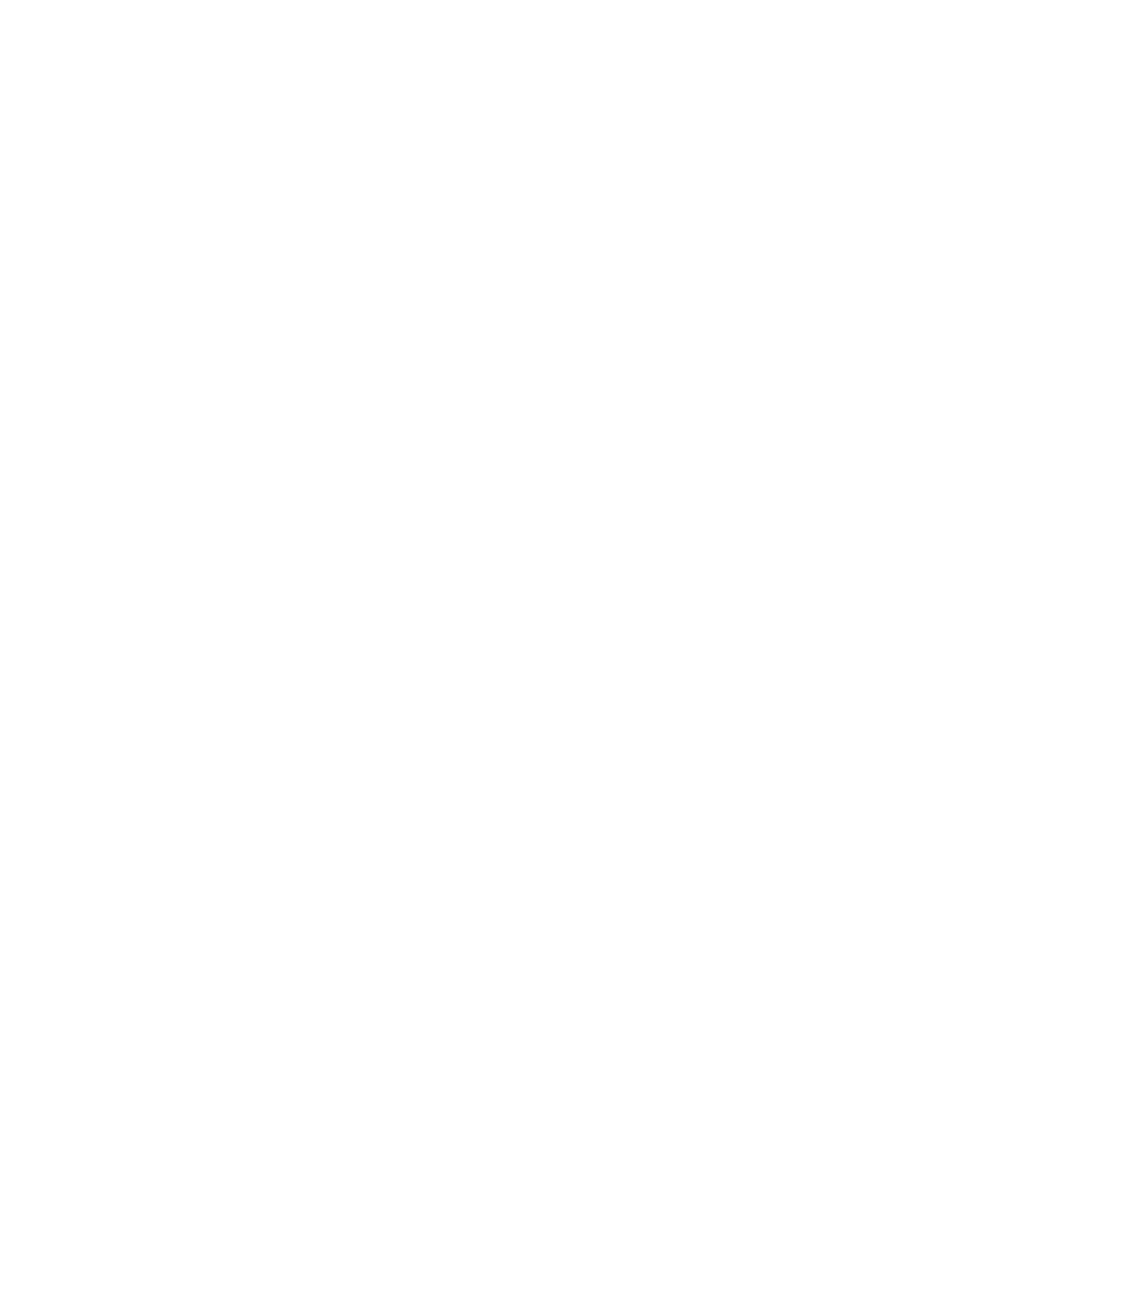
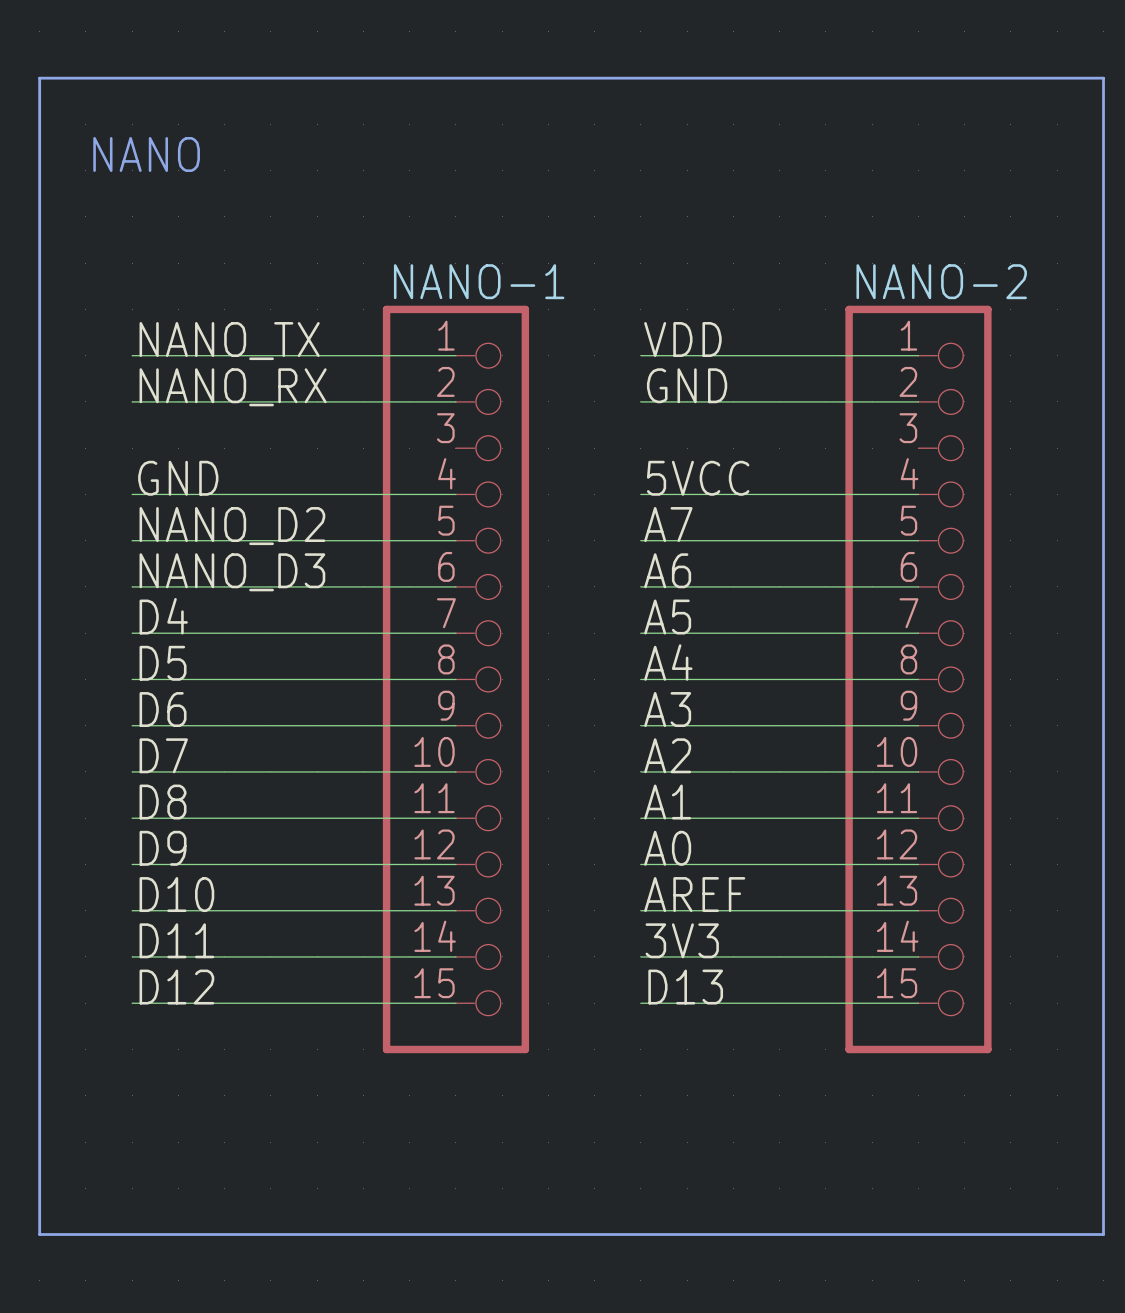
line: none -> (39, 78) (1103, 78) (1103, 1234) (39, 1234) (39, 78)
text: none -> NANO (146, 154)
label: none -> VDD (682, 339)
label: none -> NANO_TX (229, 341)
wire: none -> (132, 355) (455, 355)
wire: none -> (640, 355) (918, 355)
label: none -> GND (687, 385)
label: none -> NANO_RX (233, 387)
wire: none -> (132, 401) (455, 401)
wire: none -> (640, 401) (918, 401)
label: none -> GND (178, 478)
label: none -> 5VCC (698, 478)
wire: none -> (132, 494) (455, 494)
wire: none -> (640, 494) (918, 494)
label: none -> A7 (668, 524)
label: none -> NANO_D2 (232, 526)
wire: none -> (132, 540) (455, 540)
wire: none -> (640, 540) (918, 540)
label: none -> A6 (667, 570)
label: none -> NANO_D3 (232, 572)
wire: none -> (132, 586) (455, 586)
wire: none -> (640, 586) (918, 586)
label: none -> D4 (163, 616)
label: none -> A5 (667, 617)
wire: none -> (132, 633) (455, 633)
wire: none -> (640, 633) (918, 633)
label: none -> A4 (668, 662)
label: none -> D5 (163, 663)
wire: none -> (132, 679) (455, 679)
NANO-1: none -> (455, 679)
wire: none -> (640, 679) (918, 679)
NANO-2: none -> (918, 679)
label: none -> D6 (163, 709)
label: none -> A3 (667, 709)
wire: none -> (132, 725) (455, 725)
wire: none -> (640, 725) (918, 725)
label: none -> D7 (163, 755)
label: none -> A2 (667, 755)
wire: none -> (132, 771) (455, 771)
wire: none -> (640, 771) (918, 771)
label: none -> D8 (163, 802)
label: none -> A1 (667, 802)
wire: none -> (132, 818) (455, 818)
wire: none -> (640, 818) (918, 818)
label: none -> D9 (163, 848)
label: none -> A0 (667, 848)
wire: none -> (132, 864) (455, 864)
wire: none -> (640, 864) (918, 864)
label: none -> D10 (176, 894)
label: none -> AREF (694, 894)
wire: none -> (132, 910) (455, 910)
wire: none -> (640, 910) (918, 910)
label: none -> D11 (176, 940)
label: none -> 3V3 (682, 940)
wire: none -> (132, 956) (455, 956)
wire: none -> (640, 956) (918, 956)
label: none -> D12 (176, 987)
label: none -> D13 (685, 987)
wire: none -> (132, 1003) (455, 1003)
wire: none -> (640, 1003) (918, 1003)

